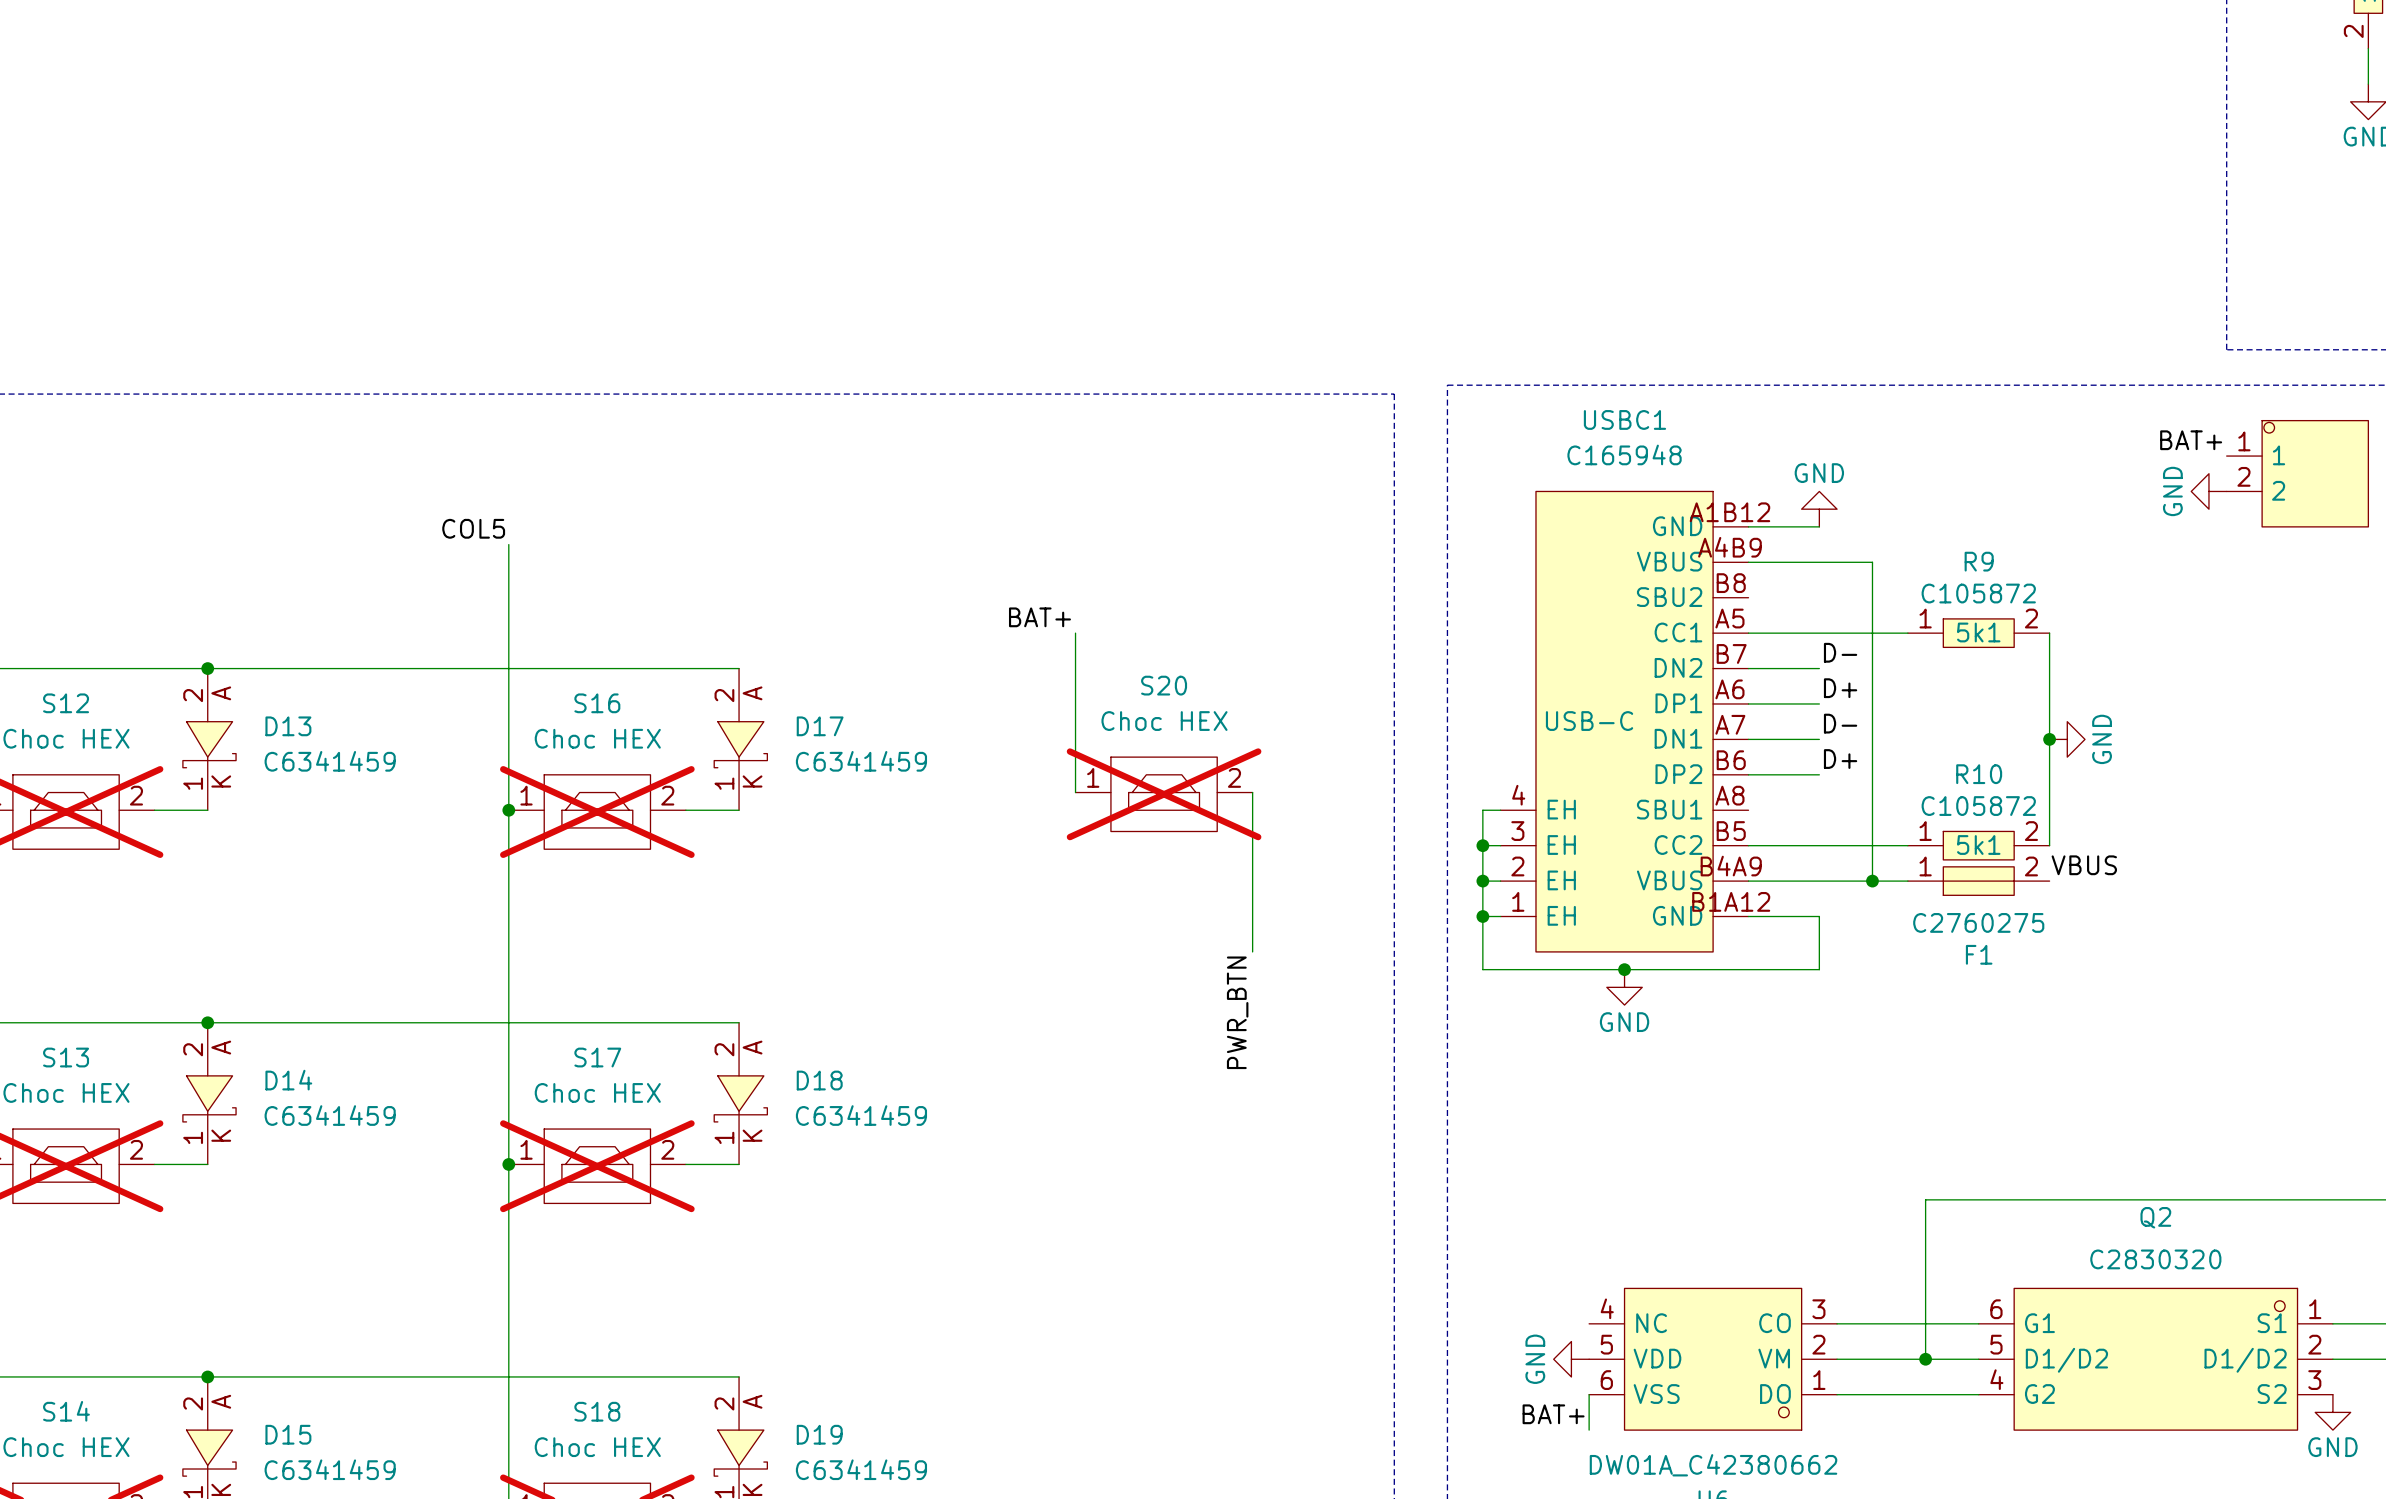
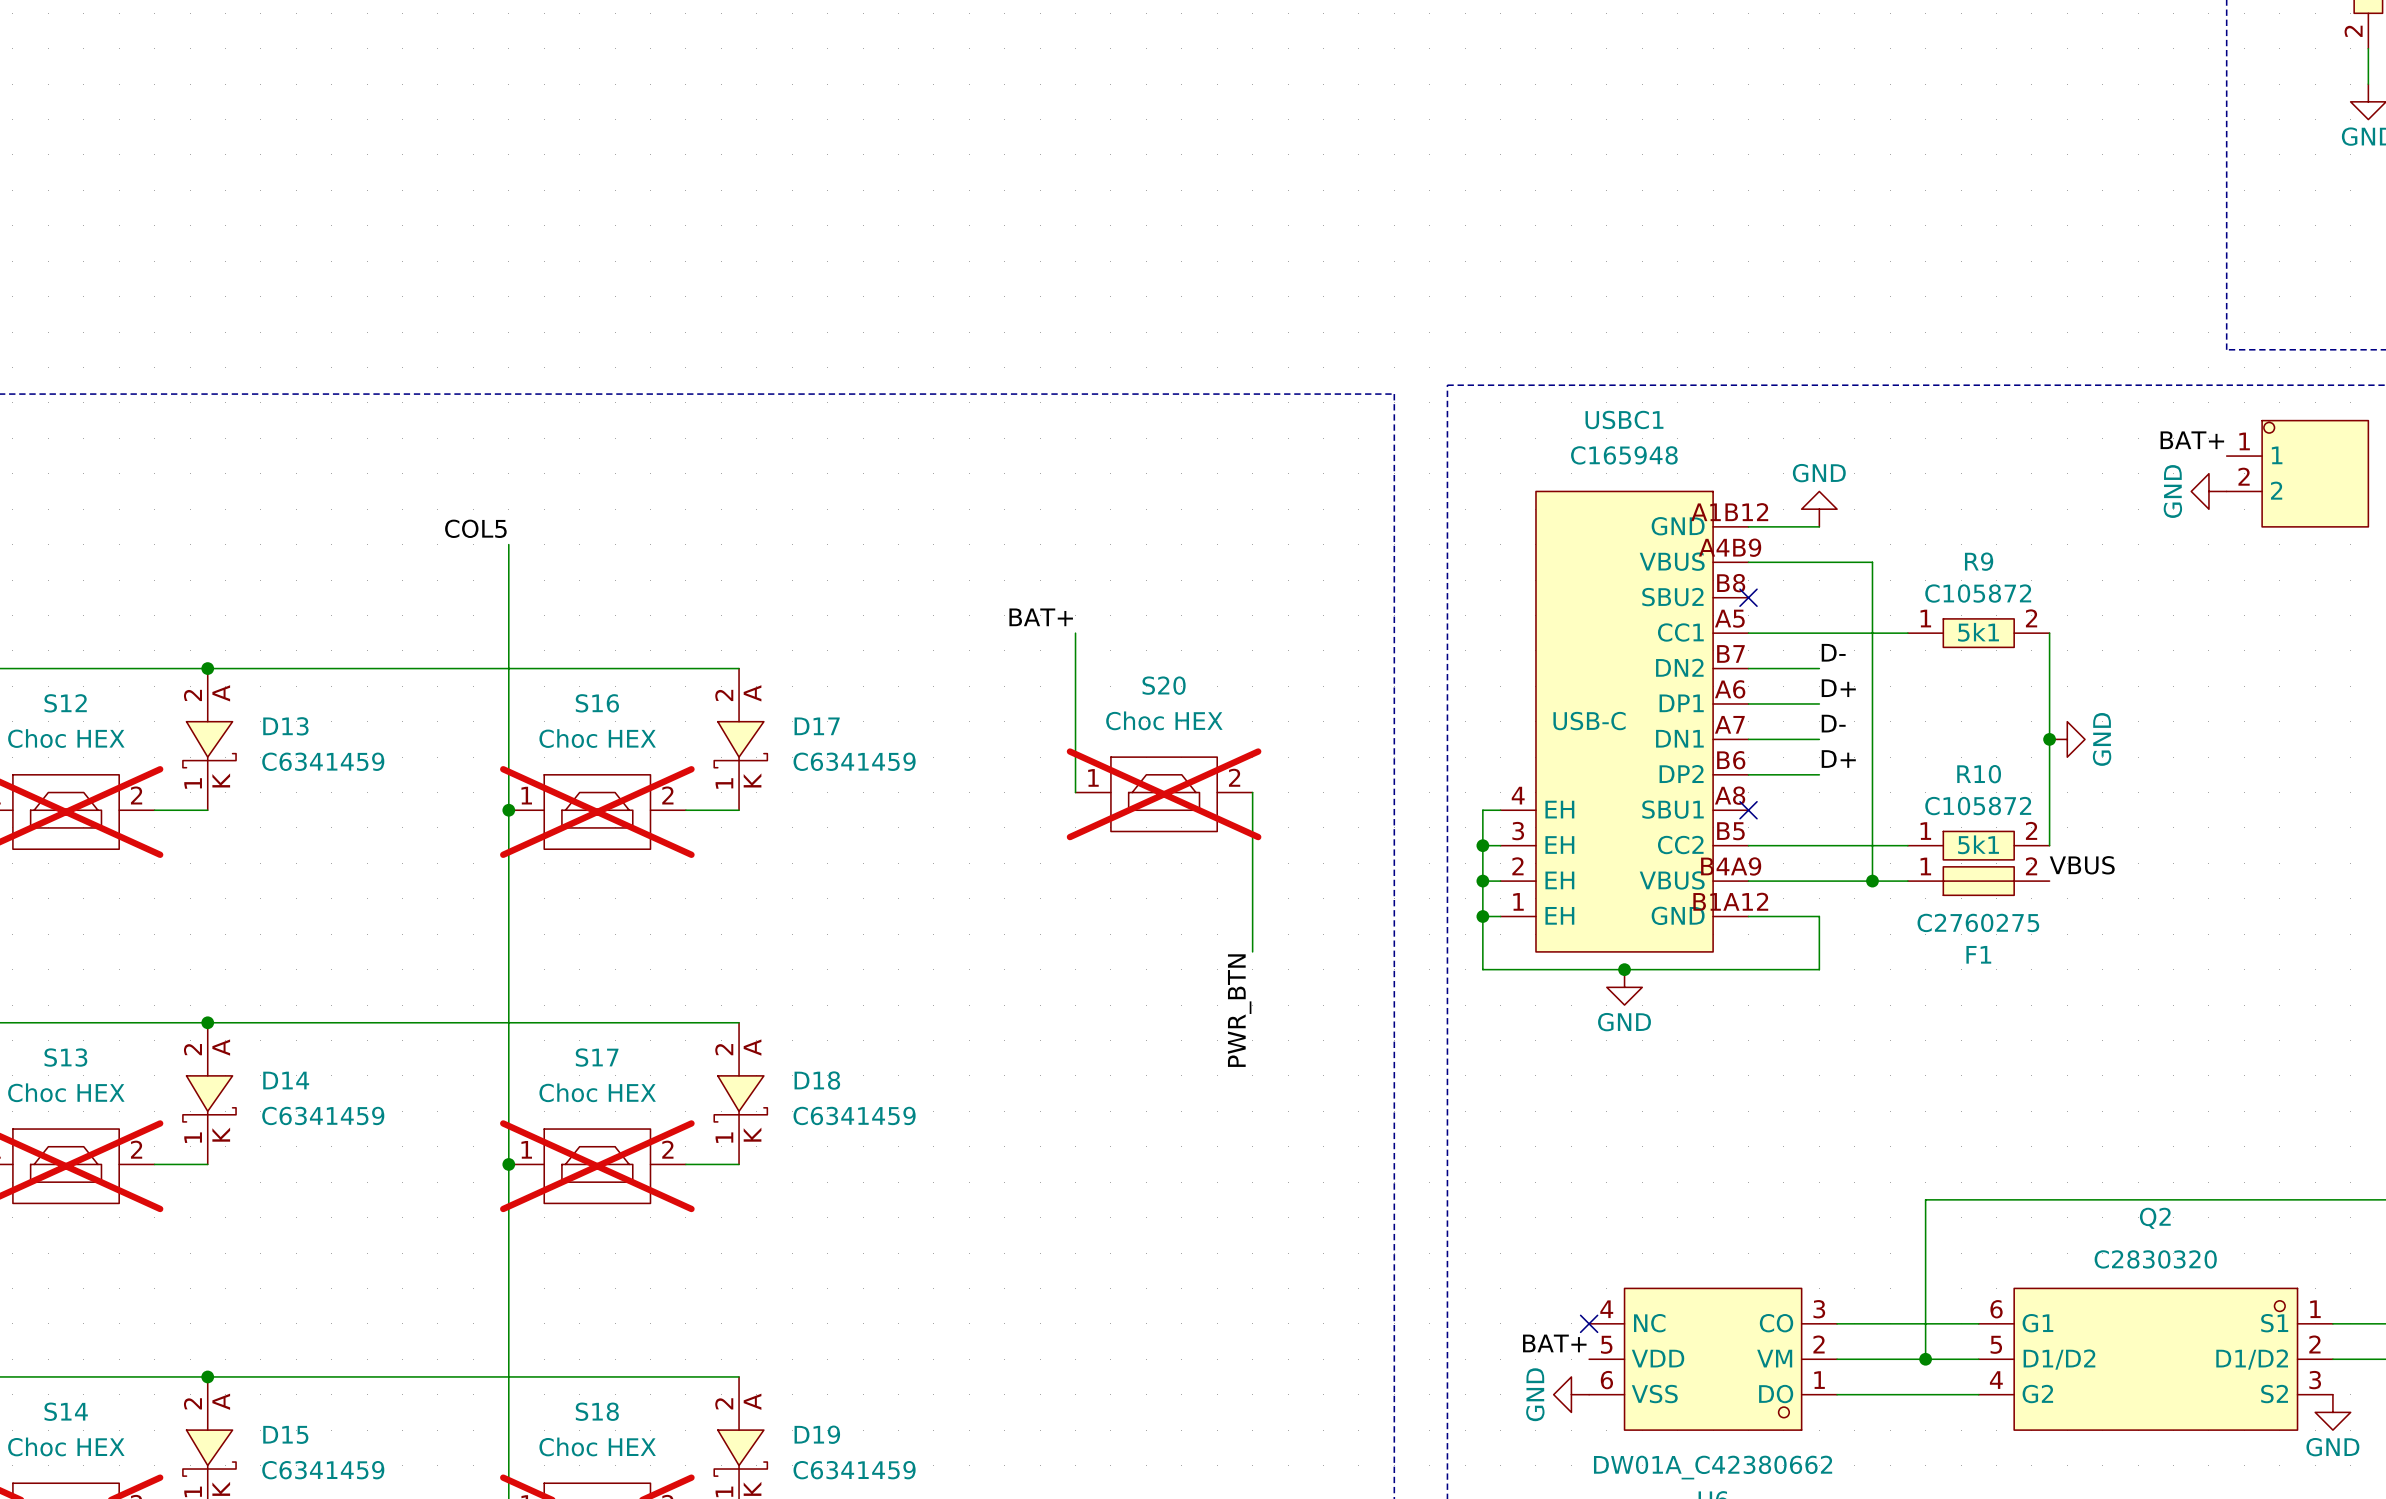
no-connect mark: none -> (1748, 597)
no-connect mark: none -> (1748, 810)
no-connect mark: none -> (1589, 1323)
power symbol position: GND (1571, 1359) -> GND (1571, 1394)
wire: (1589, 1394) (1589, 1430) -> none
label position: BAT+ (1553, 1414) -> BAT+ (1554, 1343)

